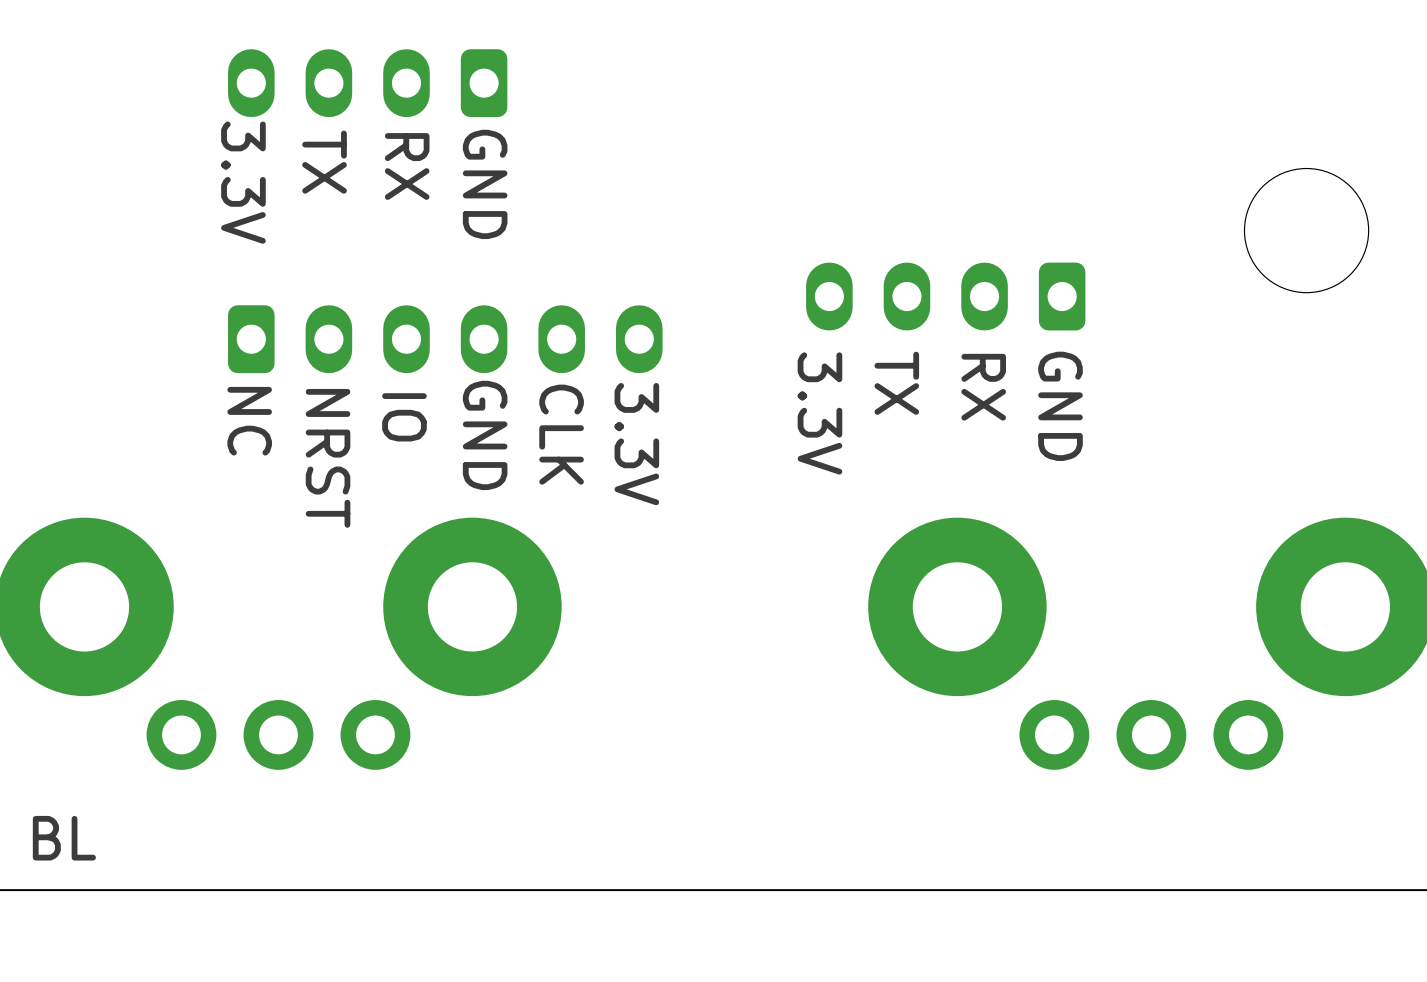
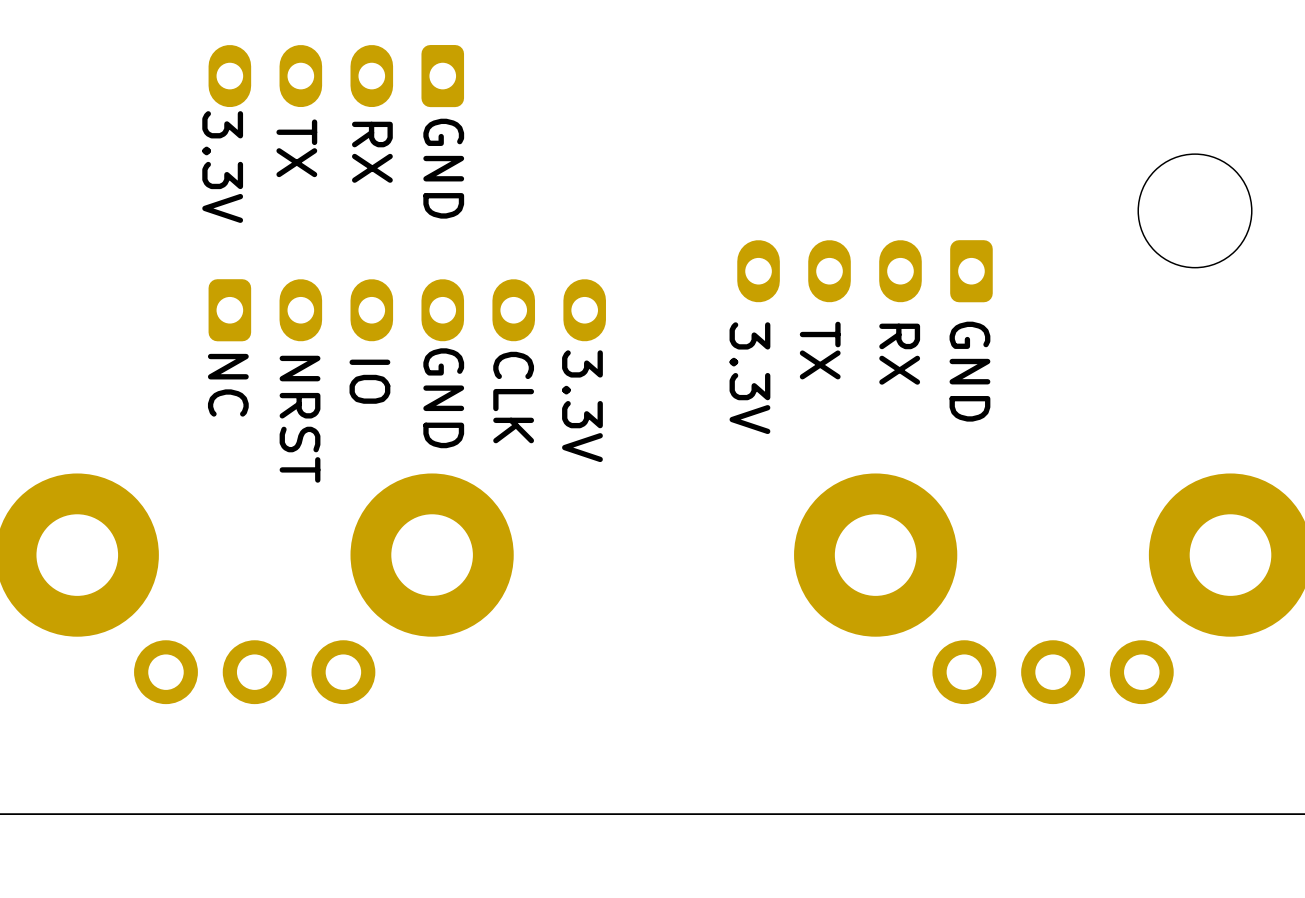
text: BL (64, 838) -> none

